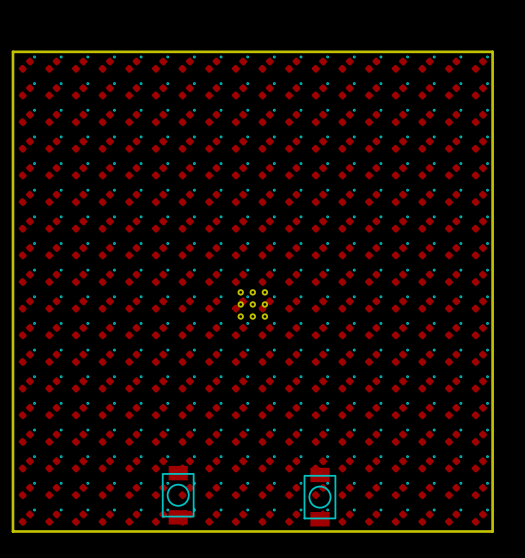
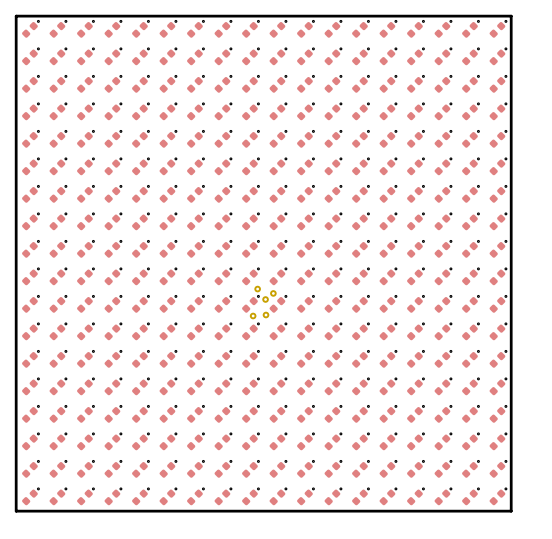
part: (252, 304) -> none
part: none -> (263, 302)
part: (178, 495) -> none
part: (319, 497) -> none

